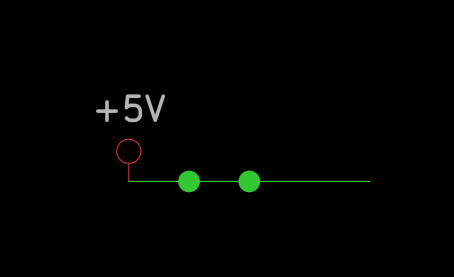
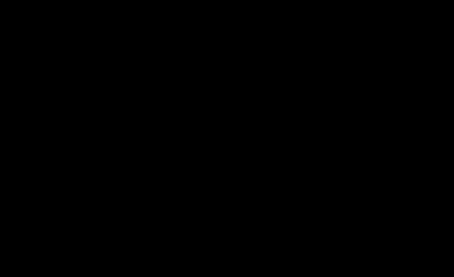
power symbol: +5V (128, 160) -> none
wire: (128, 181) (369, 181) -> none
junction: (189, 181) -> none
junction: (249, 181) -> none

